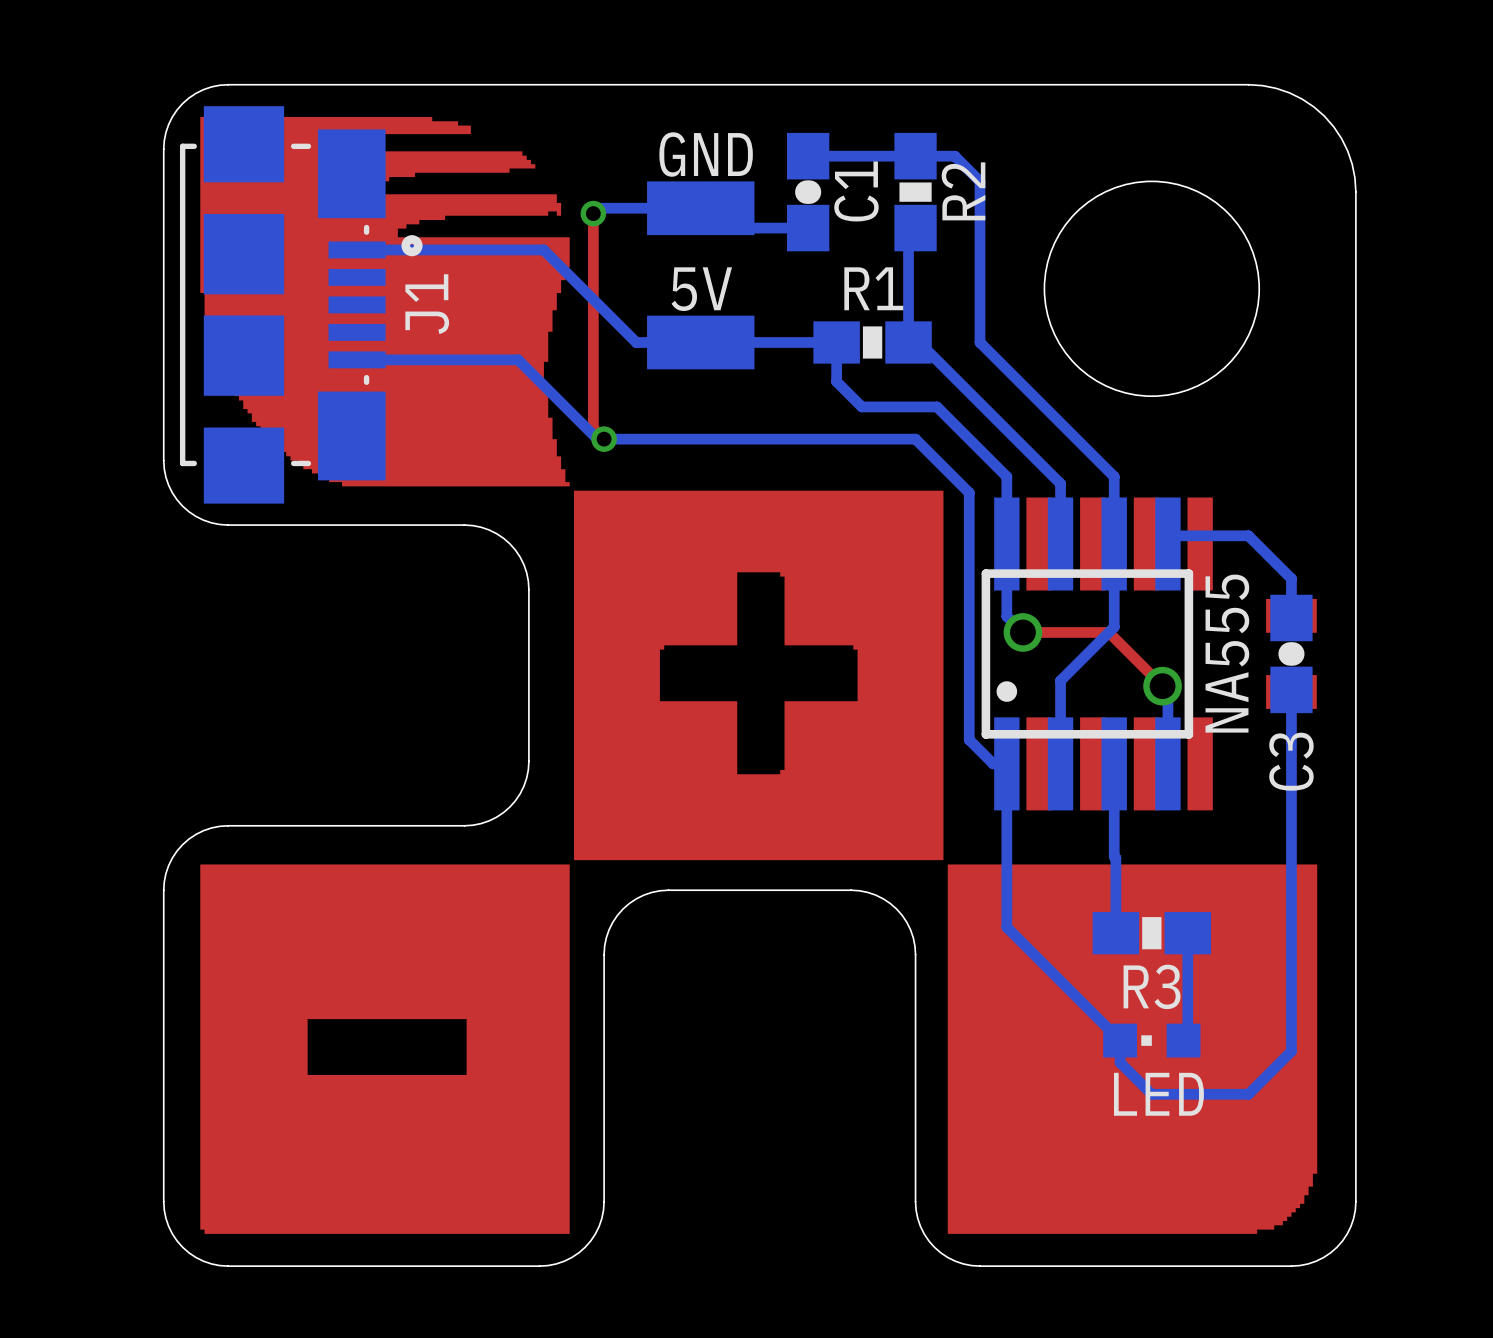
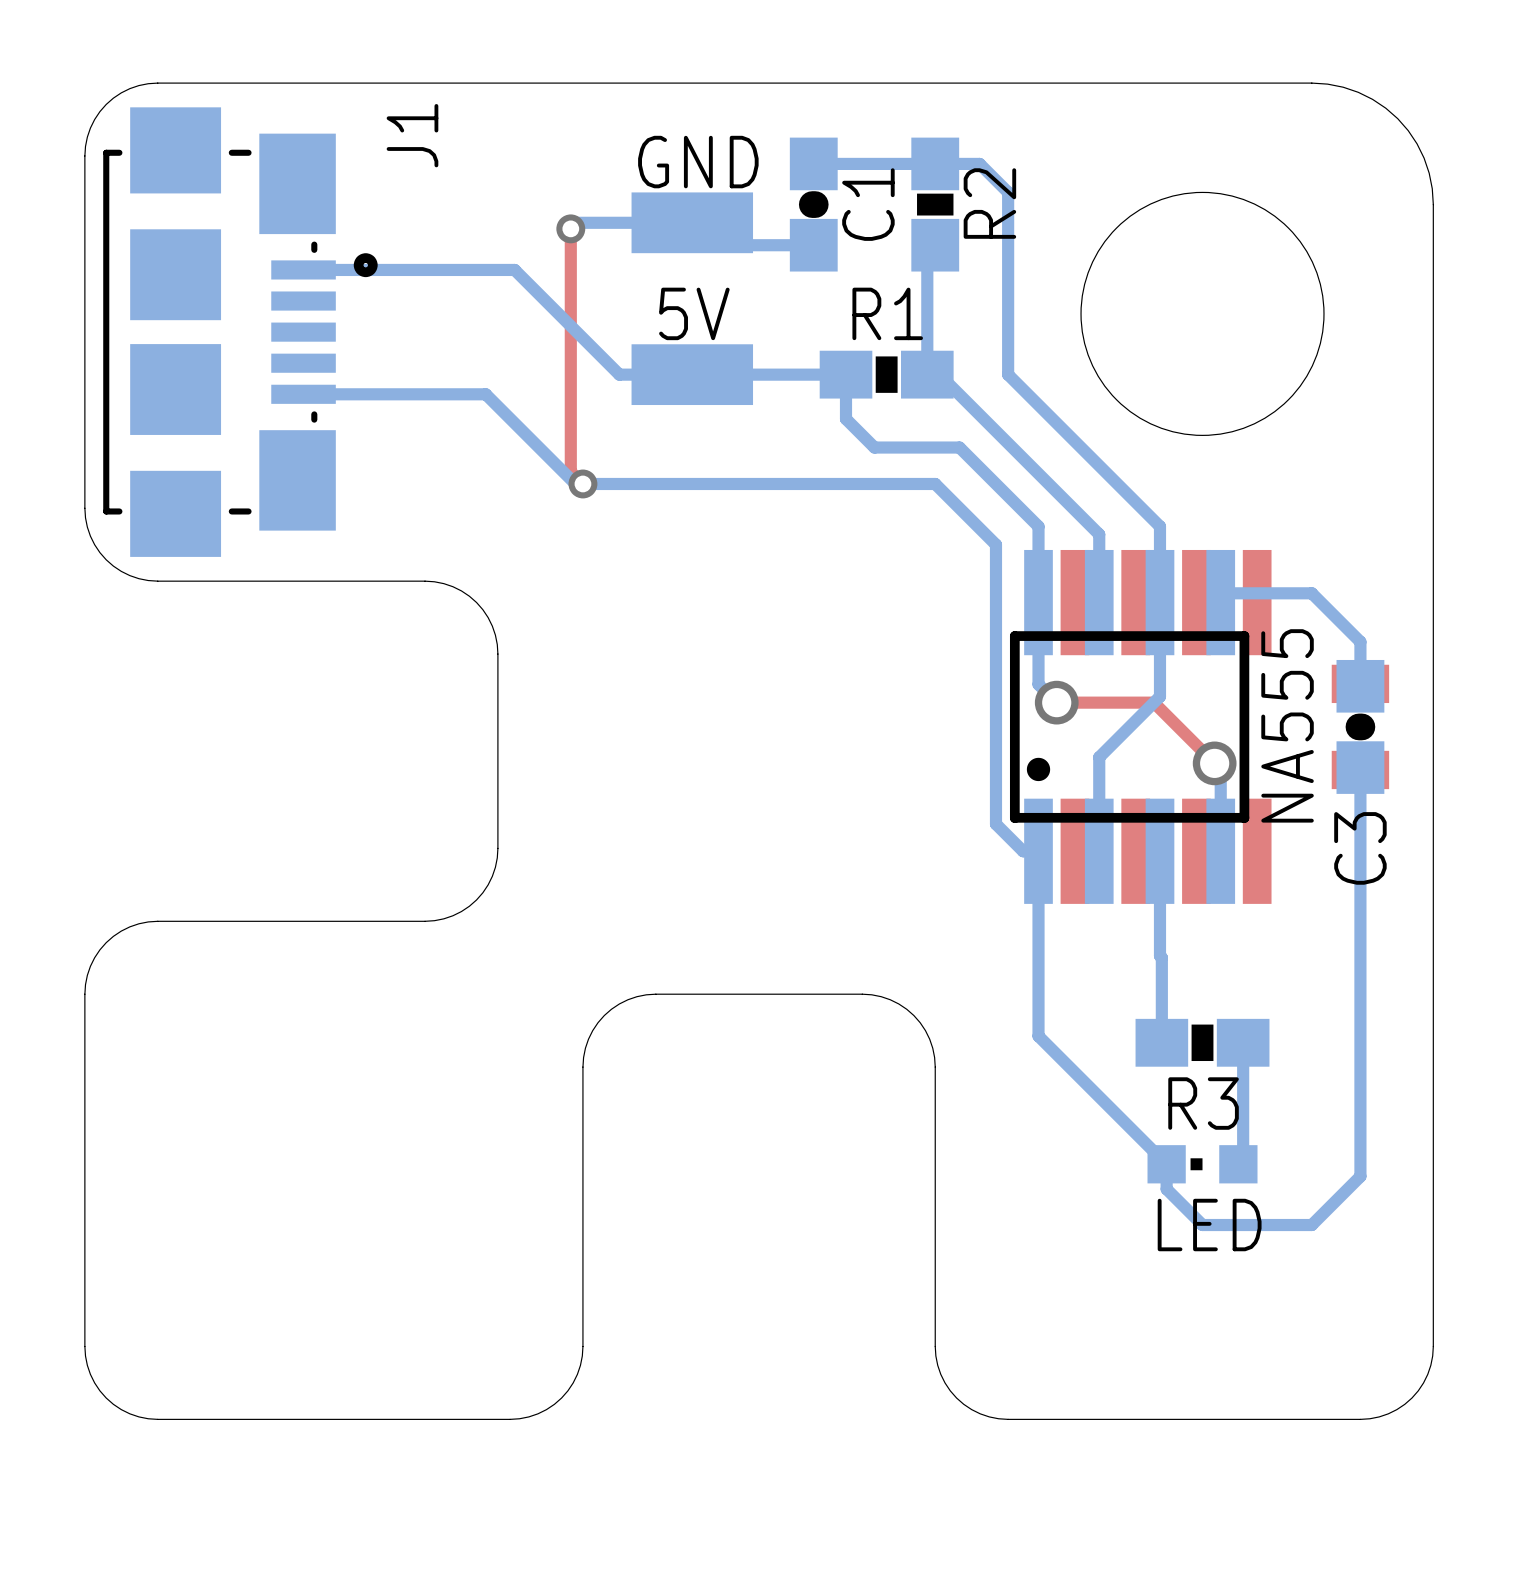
drawing: [200, 116, 1318, 1234] -> none
J1 name position: J1 (427, 304) -> J1 (412, 135)

